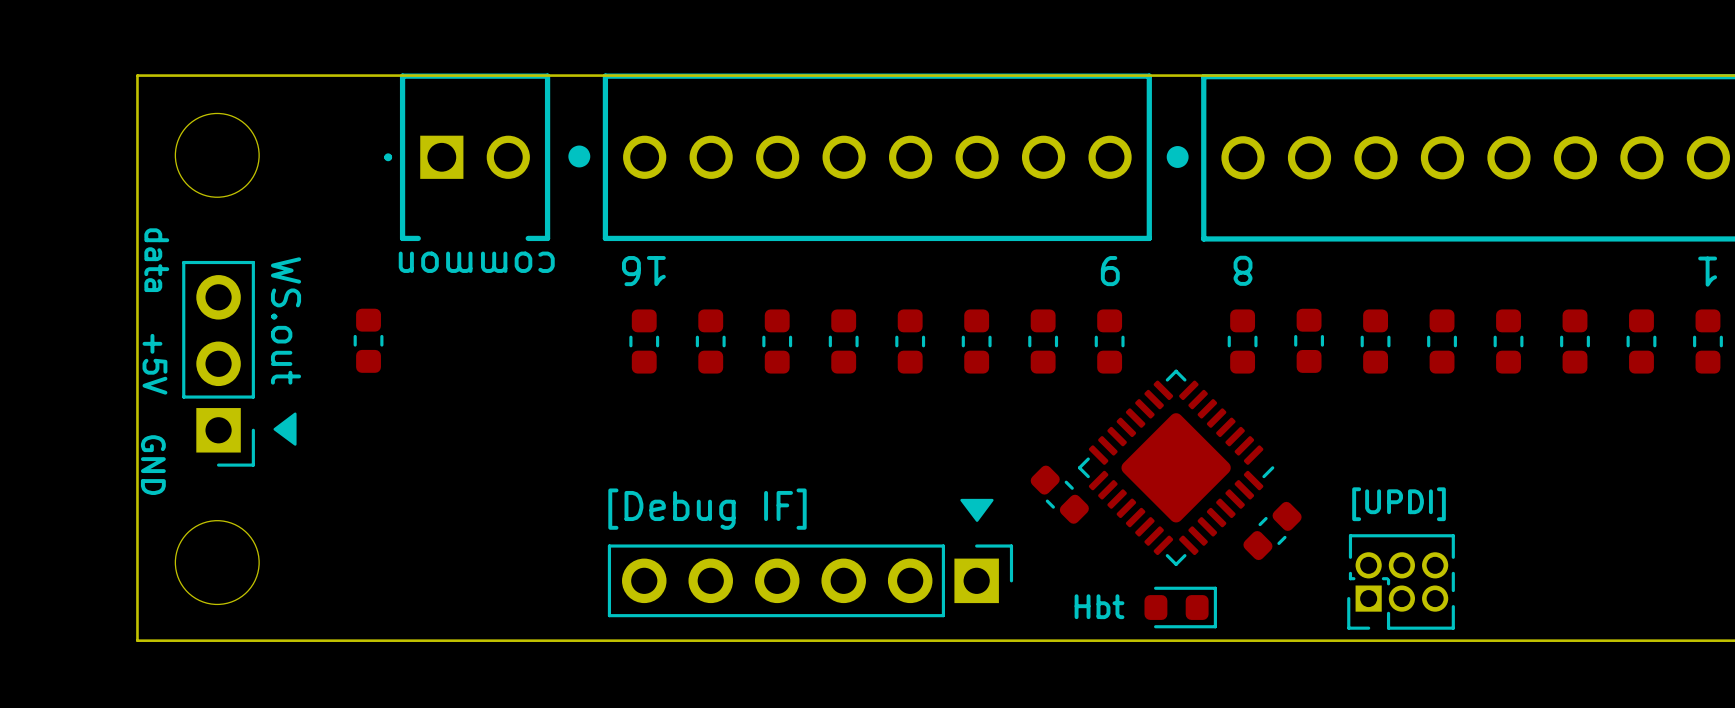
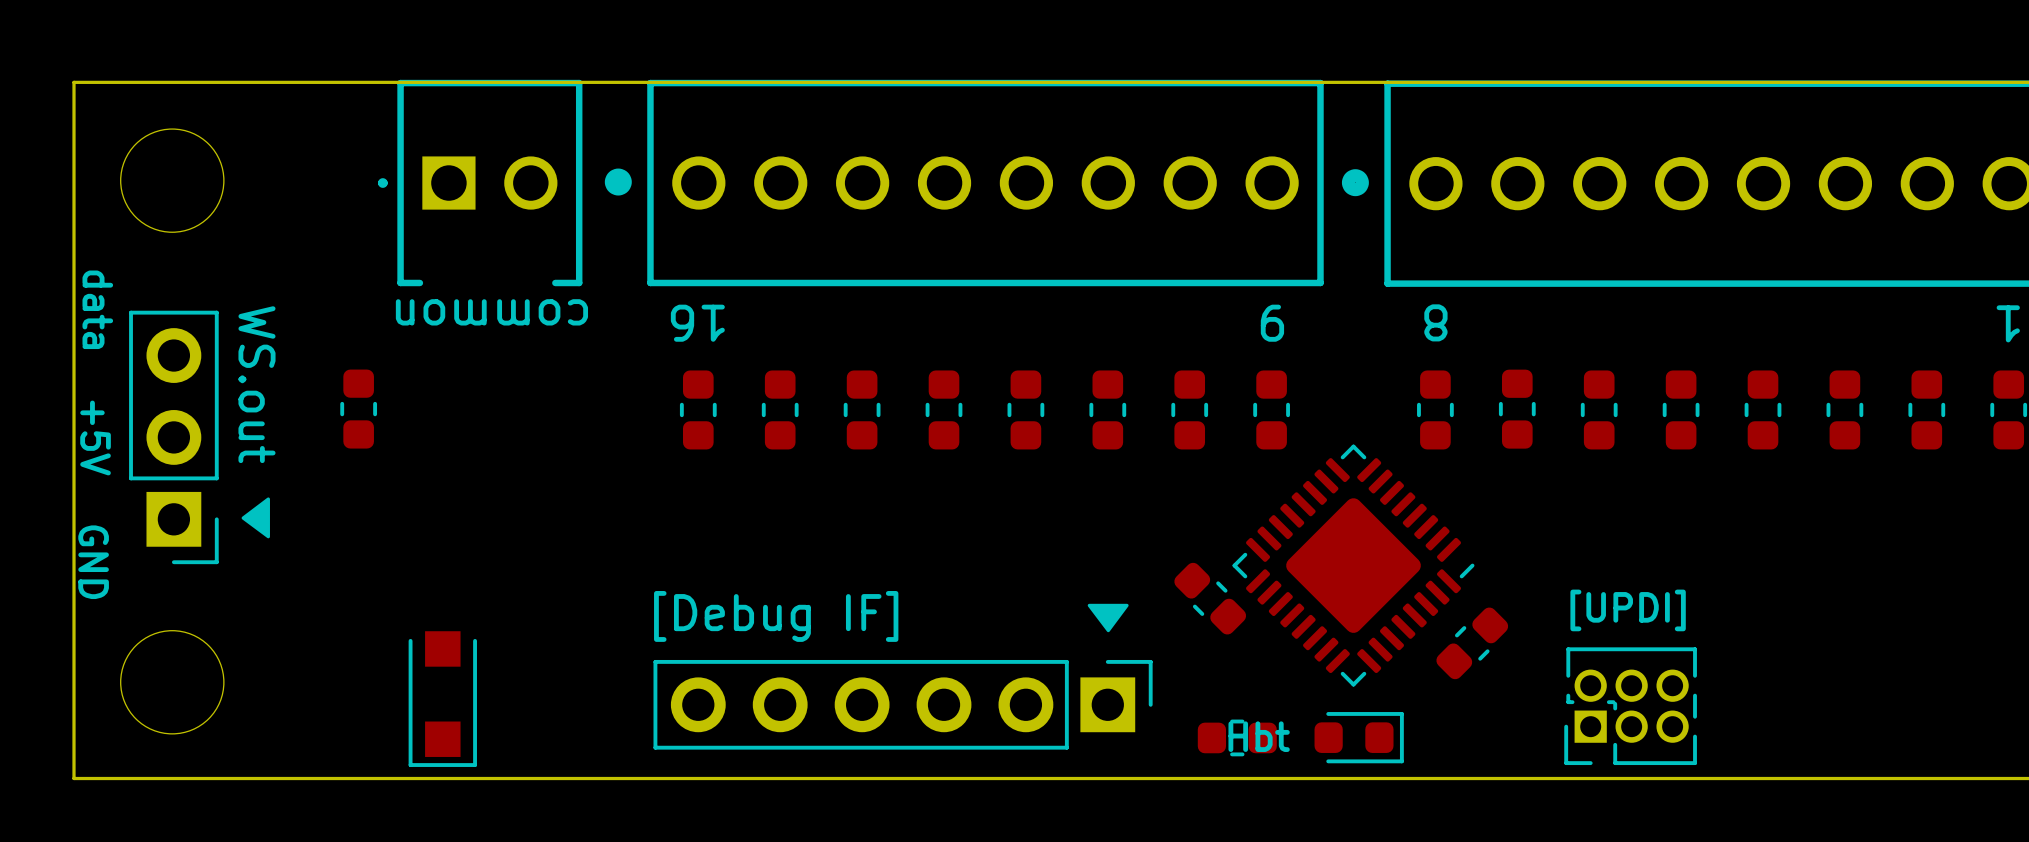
part: none -> (442, 699)
part: none -> (1237, 737)

